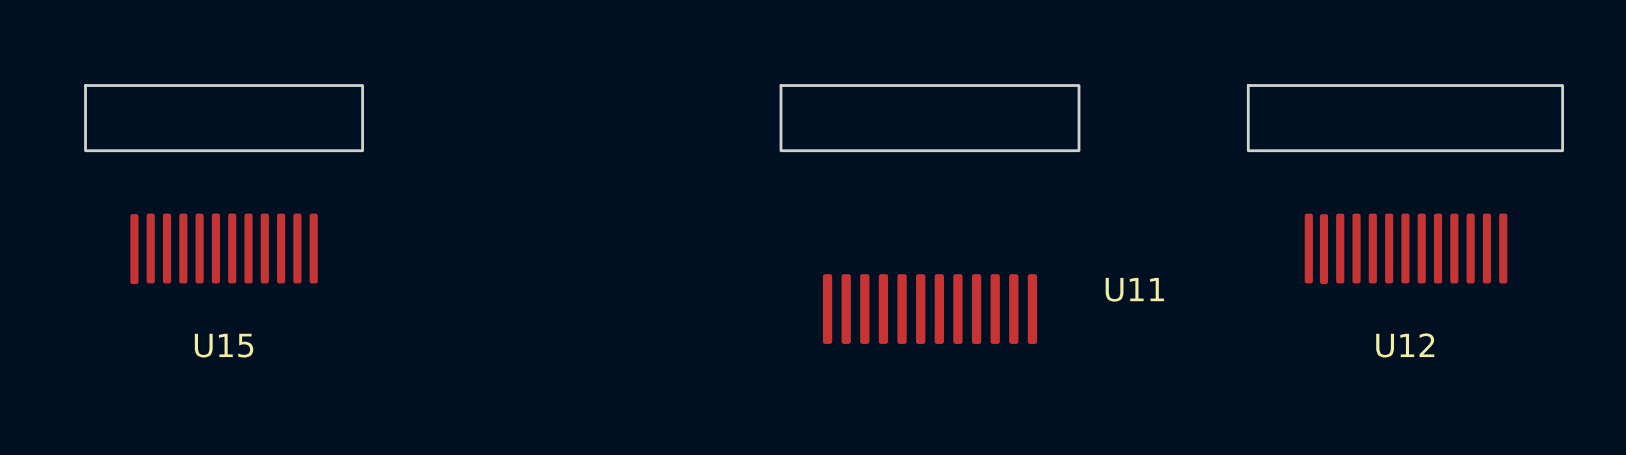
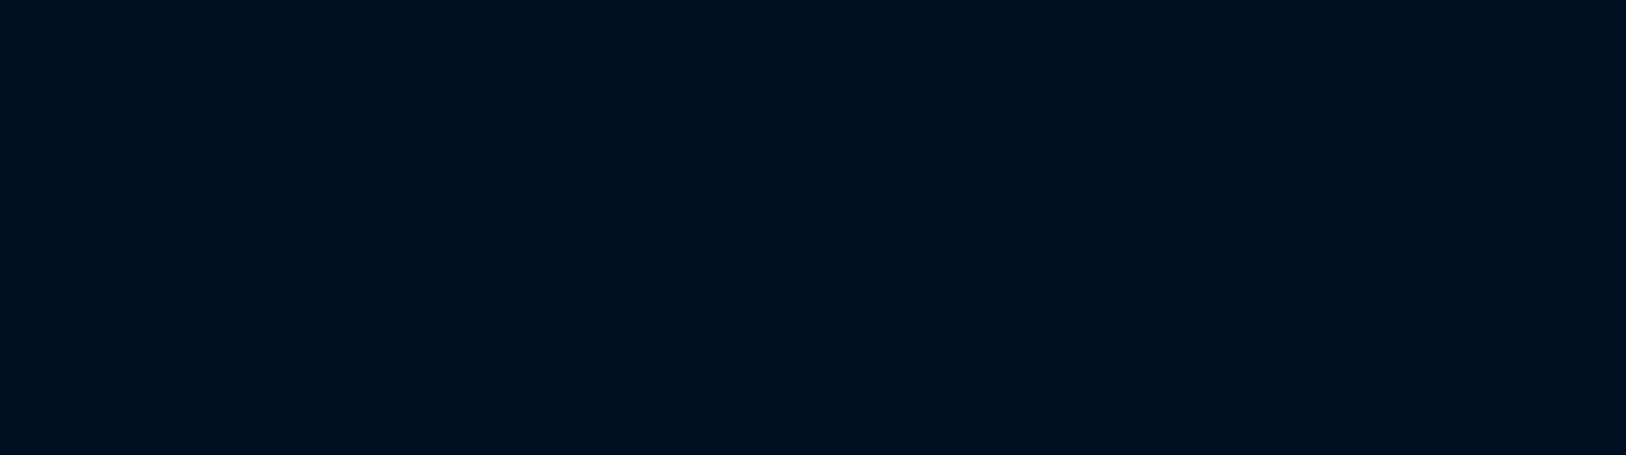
U15: (224, 184) -> none
U12: (1405, 184) -> none
U11: (930, 214) -> none

